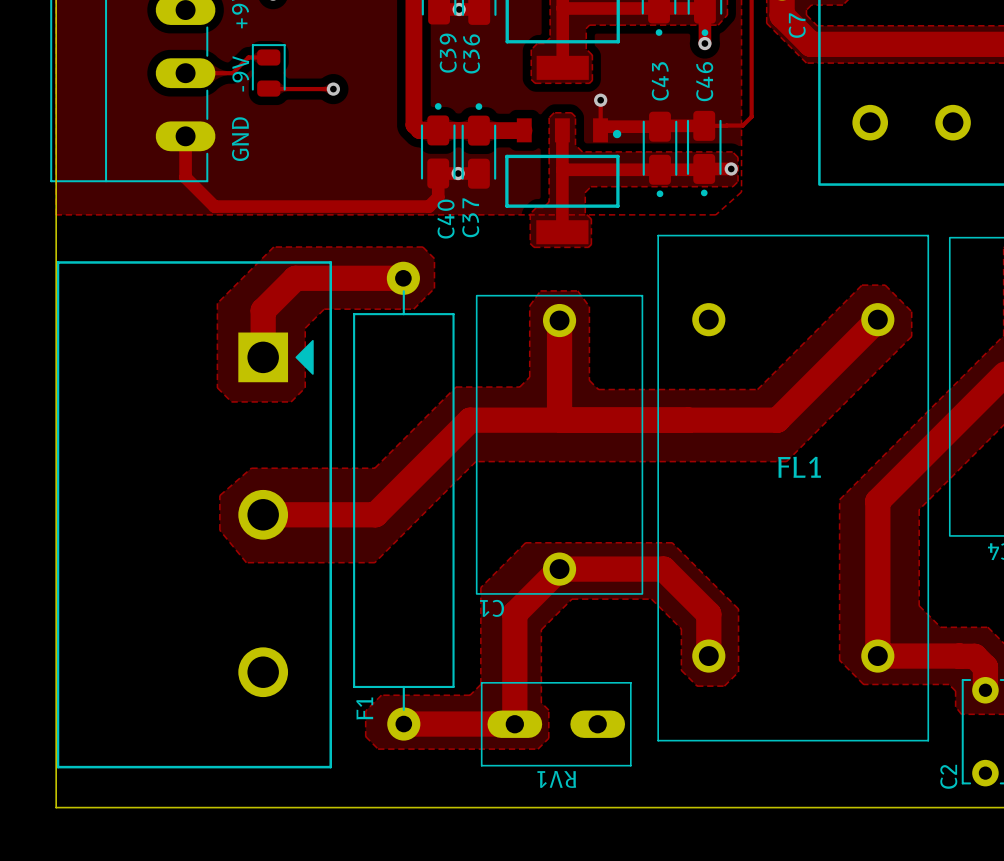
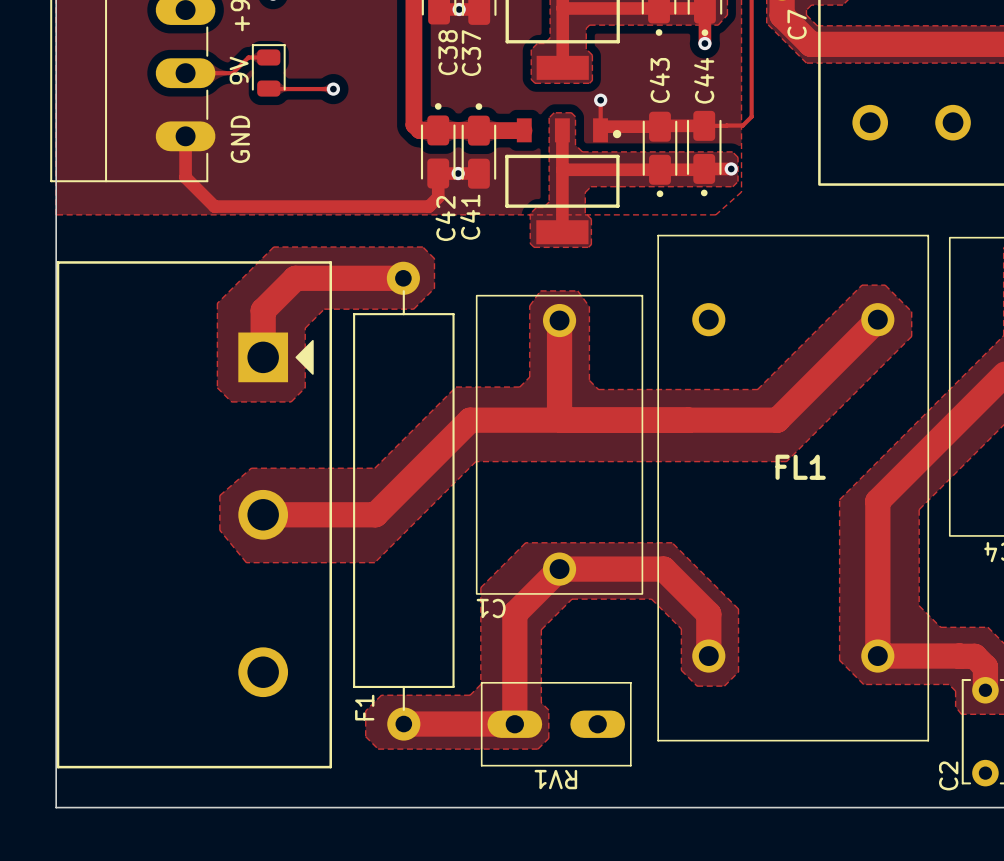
C39 name: C39 (448, 53) -> C38 (448, 52)
C36 name: C36 (471, 53) -> C37 (471, 53)
9V name: none -> 9V (239, 70)
9V value: -9V (240, 73) -> none
C46 name: C46 (704, 81) -> C44 (704, 80)
C37 name: C37 (470, 217) -> C41 (470, 217)
C40 name: C40 (446, 219) -> C42 (445, 218)

